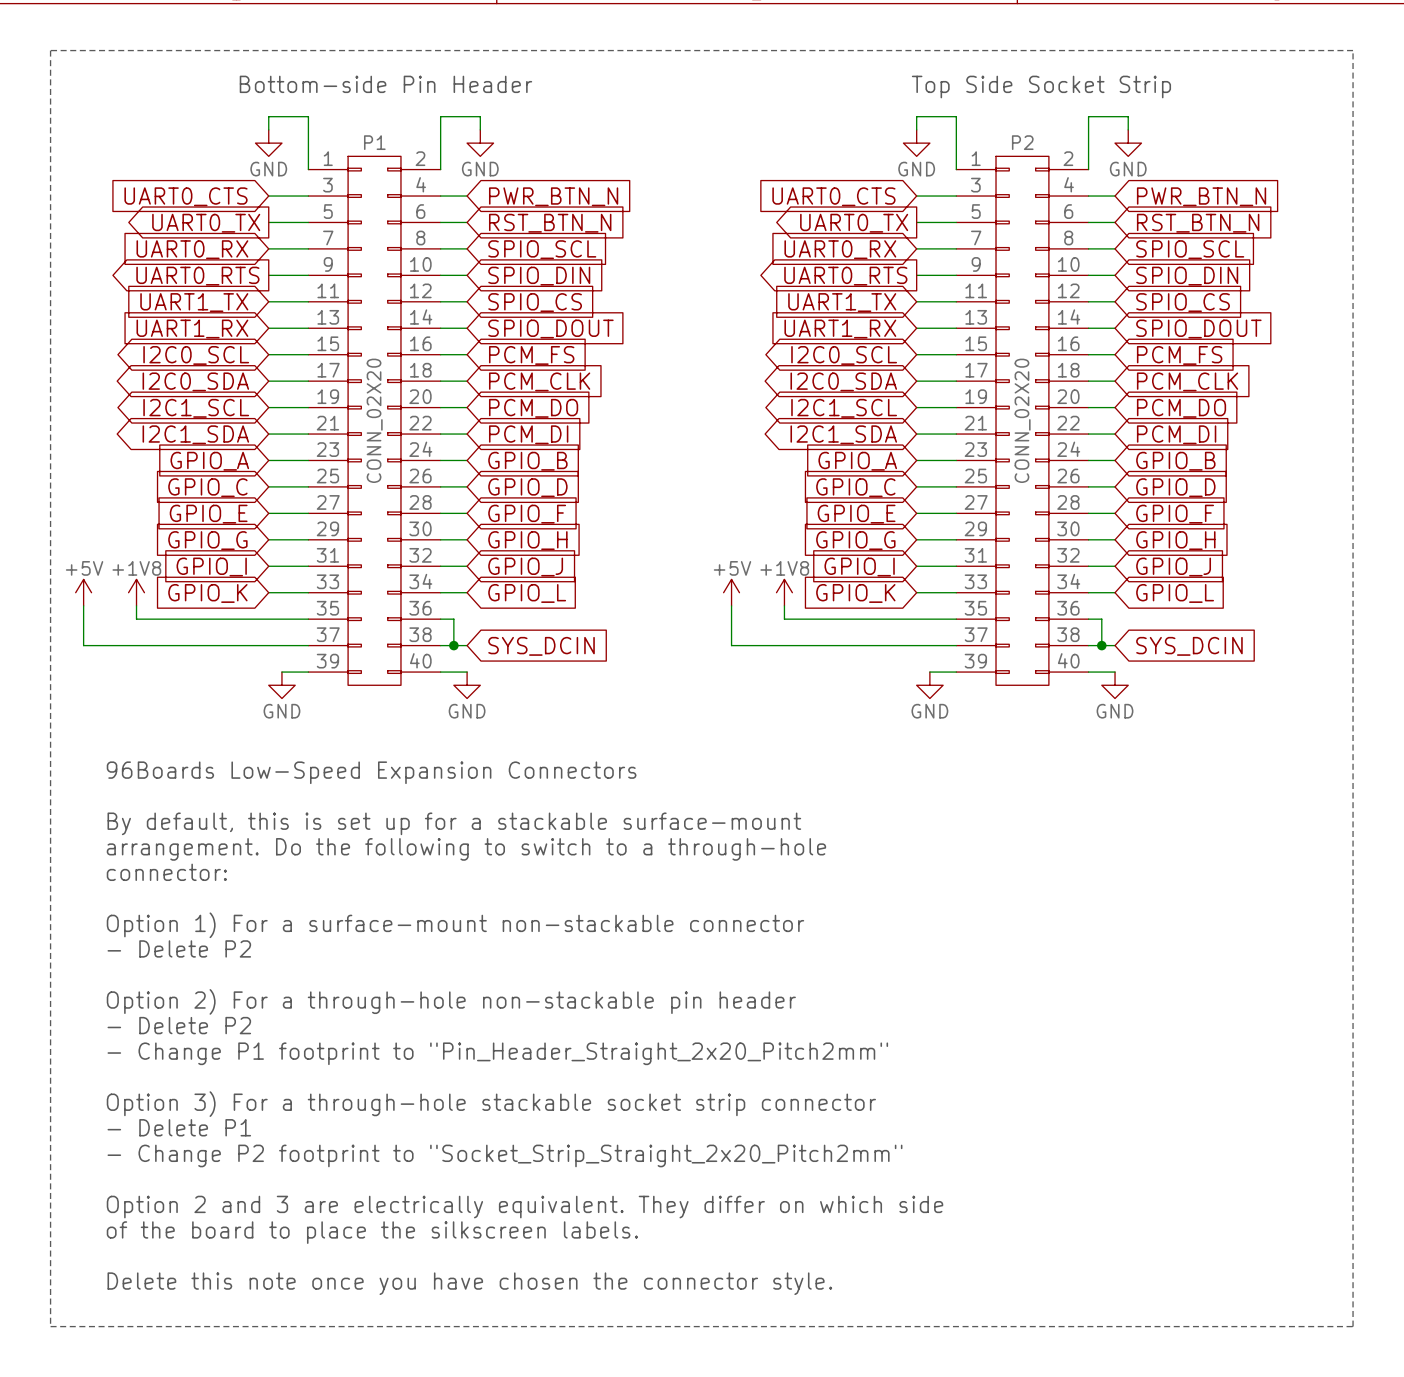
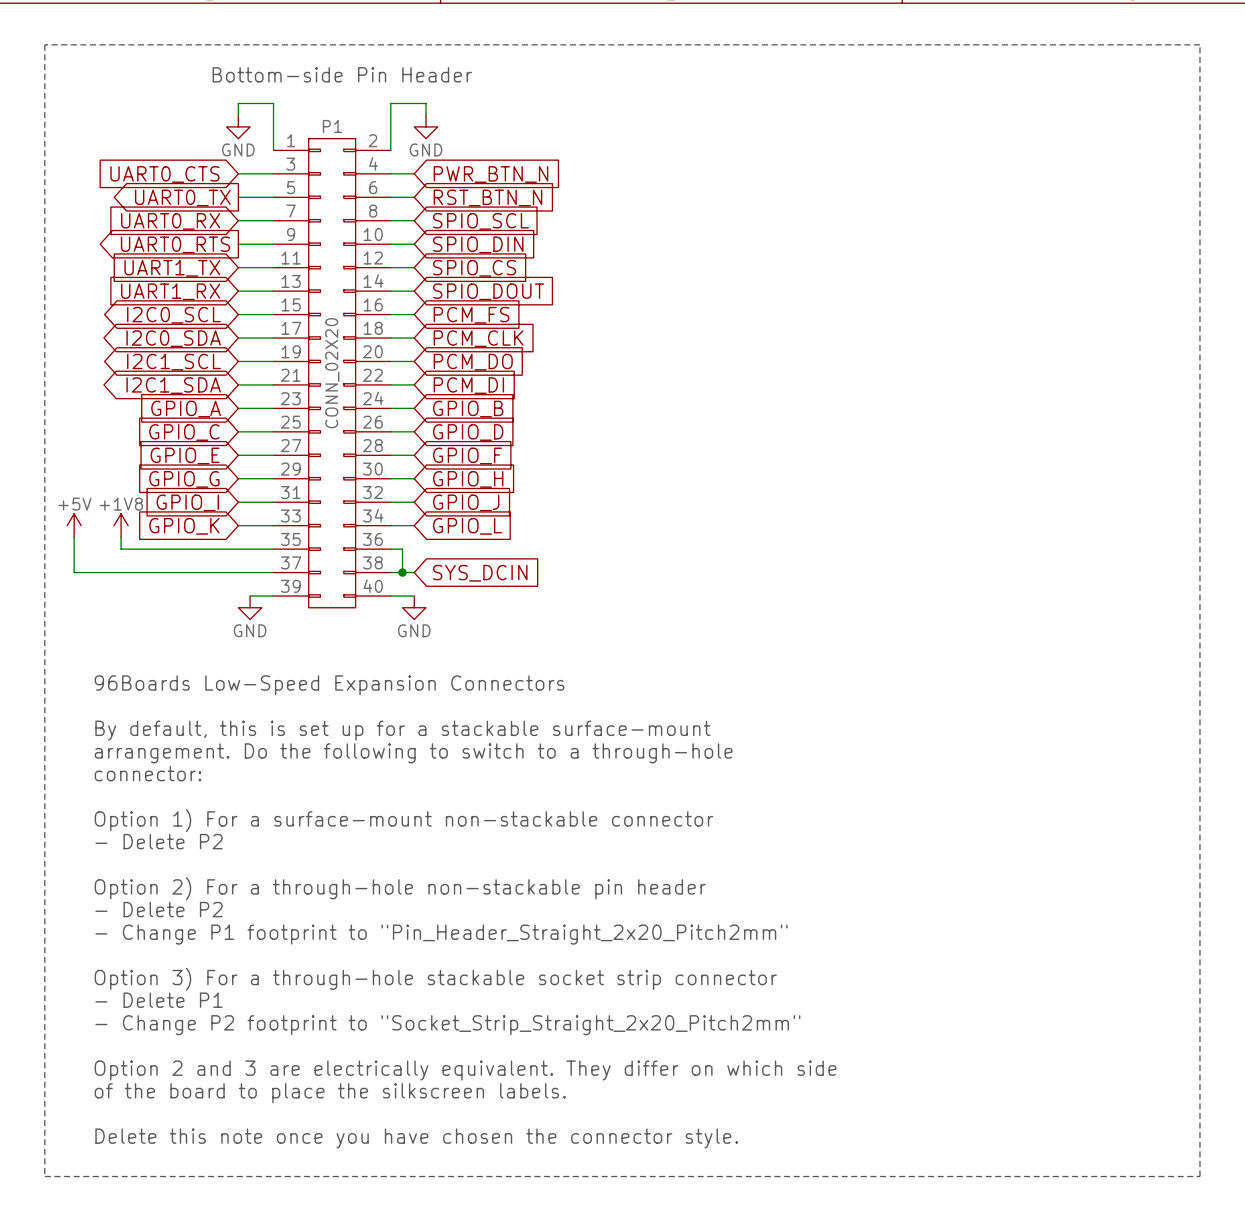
text: Top Side Socket Strip (1041, 87) -> none
wire: (916, 129) (916, 116) (956, 116) (956, 169) -> none
wire: (1128, 129) (1128, 116) (1088, 116) (1088, 169) -> none
power symbol: GND (916, 143) -> none
power symbol: GND (1128, 143) -> none
global label: UART0_CTS (833, 196) -> none
wire: (916, 196) (956, 196) -> none
wire: (1088, 196) (1115, 196) -> none
global label: PWR_BTN_N (1201, 196) -> none
wire: (916, 222) (956, 222) -> none
wire: (1088, 222) (1115, 222) -> none
global label: UART0_TX (854, 223) -> none
global label: RST_BTN_N (1198, 223) -> none
wire: (916, 248) (956, 248) -> none
wire: (1088, 248) (1115, 248) -> none
global label: UART0_RX (840, 249) -> none
global label: SPIO_SCL (1190, 249) -> none
wire: (916, 275) (956, 275) -> none
wire: (1088, 275) (1115, 275) -> none
global label: UART0_RTS (845, 276) -> none
global label: SPIO_DIN (1187, 276) -> none
wire: (916, 301) (956, 301) -> none
wire: (1088, 301) (1115, 301) -> none
global label: UART1_TX (842, 302) -> none
global label: SPIO_CS (1183, 302) -> none
wire: (916, 328) (956, 328) -> none
wire: (1088, 328) (1115, 328) -> none
global label: UART1_RX (840, 329) -> none
global label: SPIO_DOUT (1198, 329) -> none
wire: (916, 354) (956, 354) -> none
wire: (1088, 354) (1115, 354) -> none
global label: I2C0_SCL (844, 355) -> none
global label: PCM_FS (1179, 355) -> none
global label: I2C0_SDA (843, 381) -> none
wire: (916, 381) (956, 381) -> none
wire: (1088, 381) (1115, 381) -> none
global label: PCM_CLK (1187, 381) -> none
wire: (916, 407) (956, 407) -> none
wire: (1088, 407) (1115, 407) -> none
global label: I2C1_SCL (844, 408) -> none
global label: PCM_DO (1181, 408) -> none
P2: CONN_02X20 (1022, 420) -> none
global label: I2C1_SDA (843, 434) -> none
wire: (916, 434) (956, 434) -> none
wire: (1088, 434) (1115, 434) -> none
global label: PCM_DI (1176, 434) -> none
wire: (916, 460) (956, 460) -> none
wire: (1088, 460) (1115, 460) -> none
global label: GPIO_A (857, 461) -> none
global label: GPIO_B (1175, 461) -> none
wire: (916, 486) (956, 486) -> none
wire: (1088, 486) (1115, 486) -> none
global label: GPIO_C (855, 487) -> none
global label: GPIO_D (1175, 487) -> none
wire: (916, 513) (956, 513) -> none
wire: (1088, 513) (1115, 513) -> none
global label: GPIO_E (856, 514) -> none
global label: GPIO_F (1175, 514) -> none
wire: (916, 539) (956, 539) -> none
wire: (1088, 539) (1115, 539) -> none
global label: GPIO_G (855, 540) -> none
global label: GPIO_H (1175, 540) -> none
wire: (916, 566) (956, 566) -> none
wire: (1088, 566) (1115, 566) -> none
global label: GPIO_I (859, 567) -> none
global label: GPIO_J (1173, 567) -> none
power symbol: +5V (731, 592) -> none
power symbol: +1V8 (784, 592) -> none
wire: (916, 592) (956, 592) -> none
wire: (1088, 592) (1115, 592) -> none
global label: GPIO_K (855, 593) -> none
global label: GPIO_L (1175, 593) -> none
wire: (731, 605) (731, 645) (956, 645) -> none
wire: (784, 605) (784, 619) (956, 619) -> none
wire: (1088, 619) (1101, 619) (1101, 645) -> none
wire: (1088, 645) (1115, 645) -> none
junction: (1101, 645) -> none
global label: SYS_DCIN (1189, 646) -> none
wire: (929, 672) (956, 672) -> none
wire: (1088, 672) (1115, 672) -> none
power symbol: GND (929, 685) -> none
power symbol: GND (1115, 685) -> none

